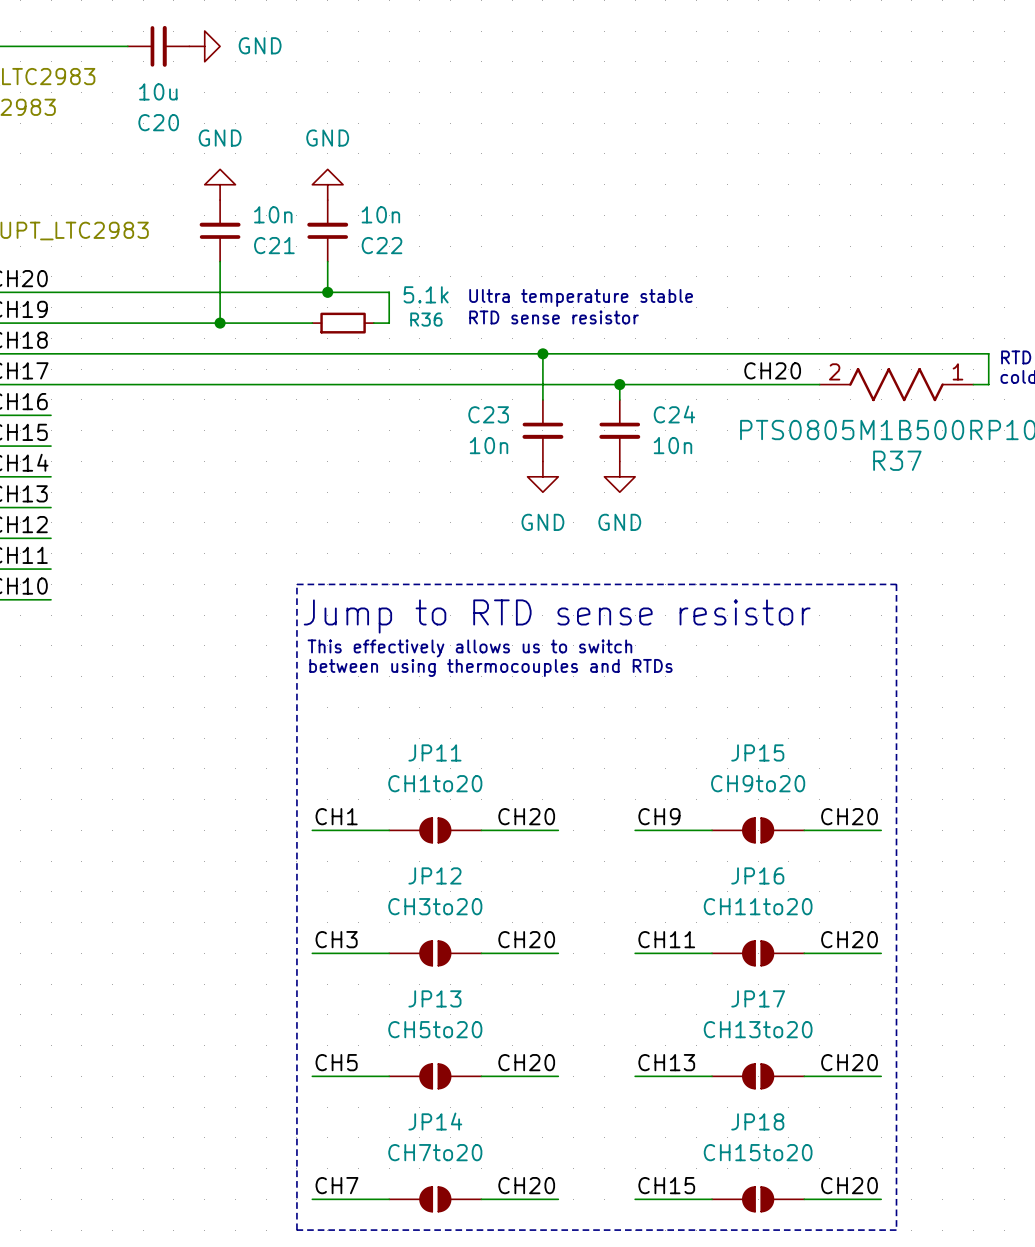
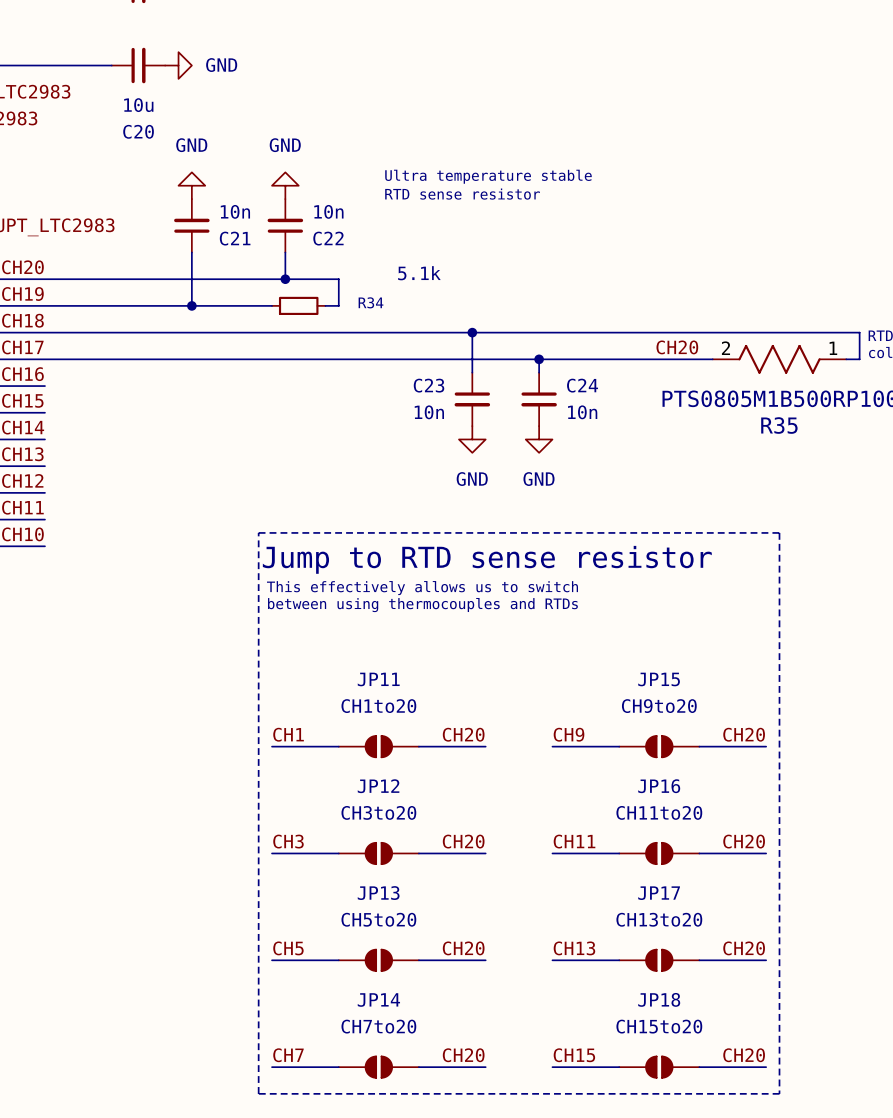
R36 value position: 5.1k (426, 294) -> 5.1k (419, 273)
text position: Ultra temperature stable (581, 297) -> Ultra temperature stable (488, 176)
text position: RTD sense resistor (554, 317) -> RTD sense resistor (462, 194)
R36 name: R36 (426, 319) -> R34 (370, 302)
R37 name: R37 (897, 460) -> R35 (779, 425)

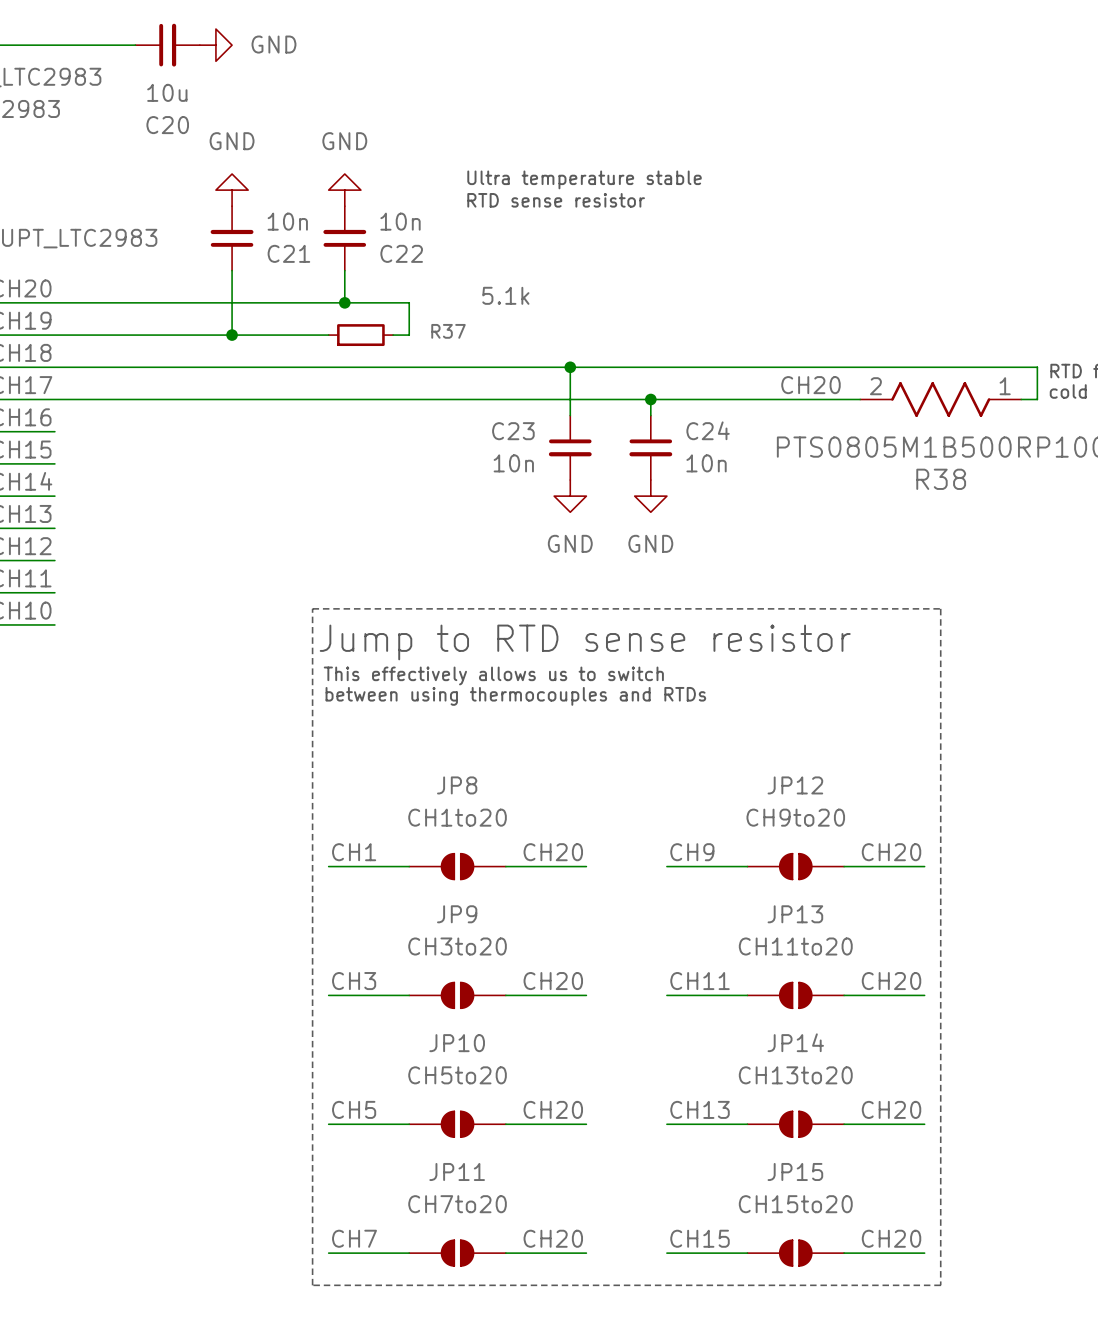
R34 name: R34 (370, 302) -> R37 (448, 331)
R35 name: R35 (779, 425) -> R38 (941, 479)
JP11 name: JP11 (378, 679) -> JP8 (457, 785)
JP15 name: JP15 (659, 679) -> JP12 (795, 785)
JP12 name: JP12 (378, 786) -> JP9 (457, 914)
JP16 name: JP16 (659, 786) -> JP13 (795, 914)
JP13 name: JP13 (378, 893) -> JP10 (457, 1043)
JP17 name: JP17 (659, 893) -> JP14 (795, 1042)
JP18 name: JP18 (659, 999) -> JP15 (795, 1171)
JP14 name: JP14 (378, 1000) -> JP11 (457, 1171)

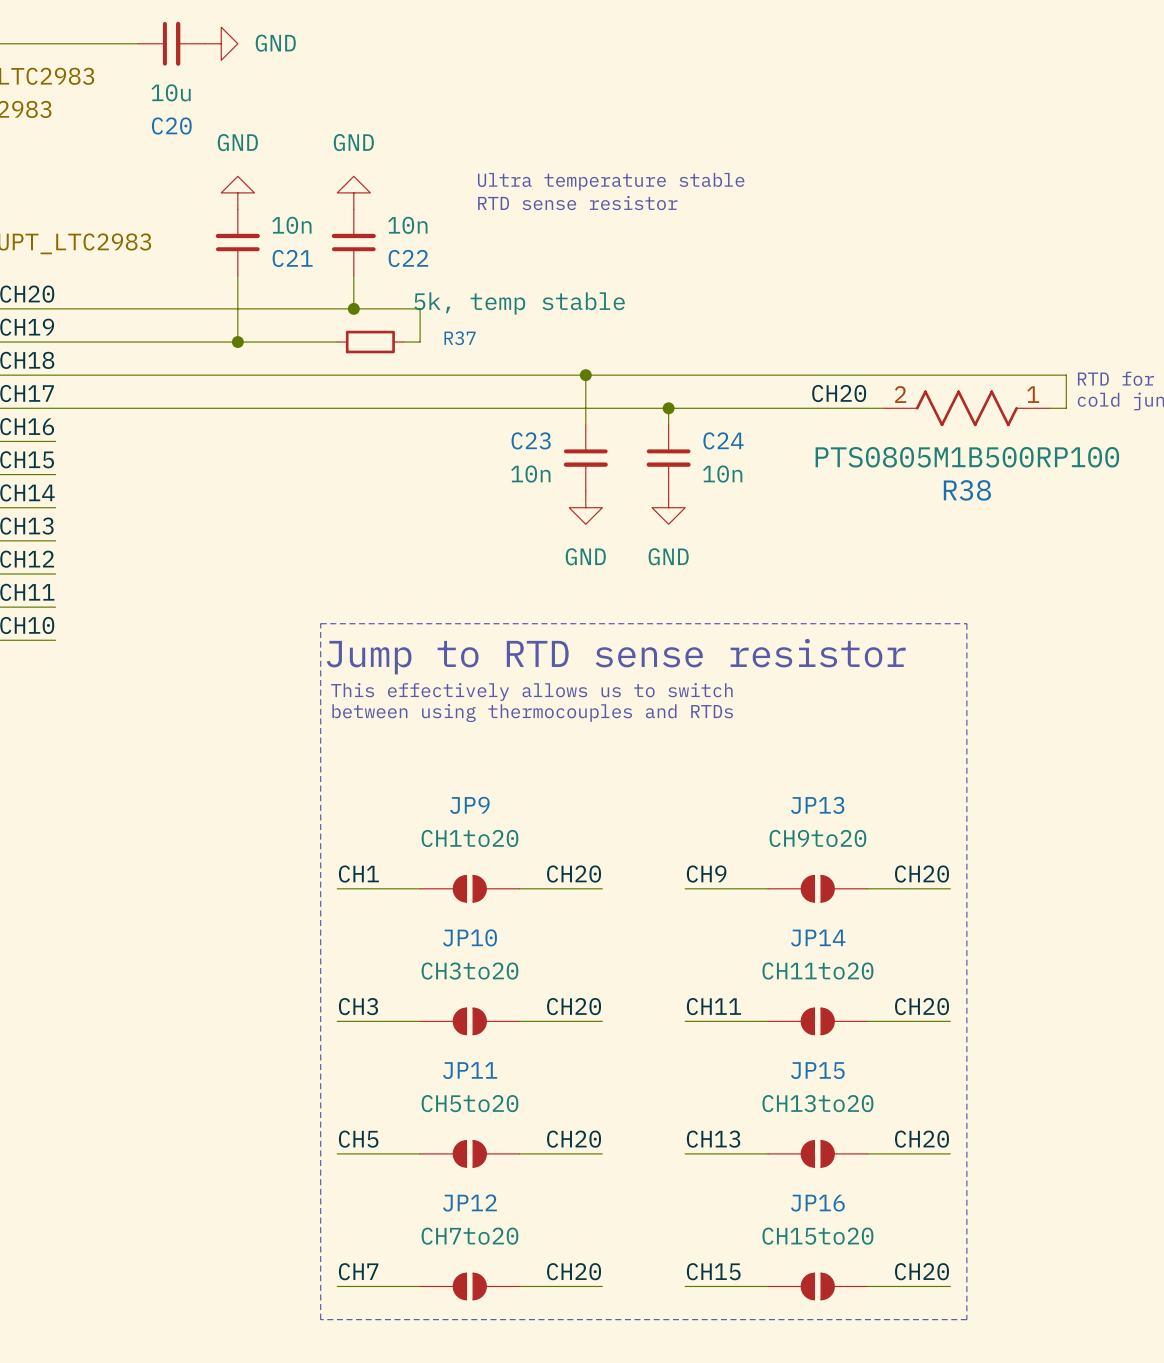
R37 value: 5.1k (505, 295) -> 5k, temp stable (519, 303)
JP8 name: JP8 (457, 785) -> JP9 (469, 805)
JP12 name: JP12 (795, 785) -> JP13 (817, 805)
JP9 name: JP9 (457, 914) -> JP10 (470, 937)
JP13 name: JP13 (795, 914) -> JP14 (818, 938)
JP14 name: JP14 (795, 1042) -> JP15 (817, 1070)
JP10 name: JP10 (457, 1043) -> JP11 (470, 1070)
JP11 name: JP11 (457, 1171) -> JP12 (469, 1203)
JP15 name: JP15 (795, 1171) -> JP16 (817, 1203)

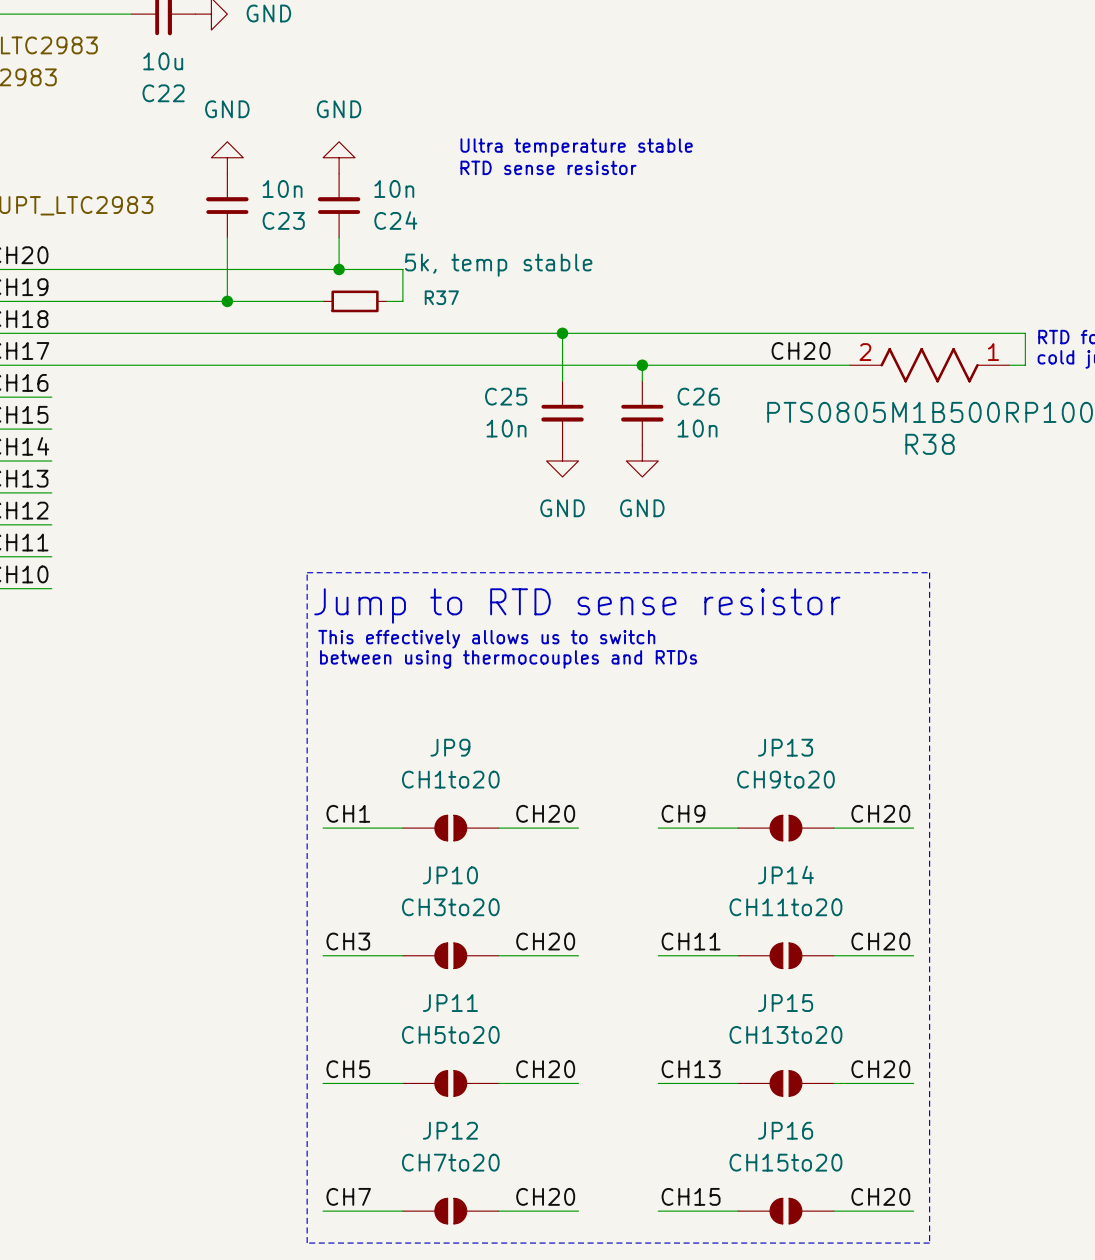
C20 name: C20 (171, 126) -> C22 (163, 93)
C21 name: C21 (292, 258) -> C23 (283, 220)
C22 name: C22 (408, 258) -> C24 (395, 220)
C23 name: C23 (531, 440) -> C25 (506, 396)
C24 name: C24 (723, 440) -> C26 (698, 396)

